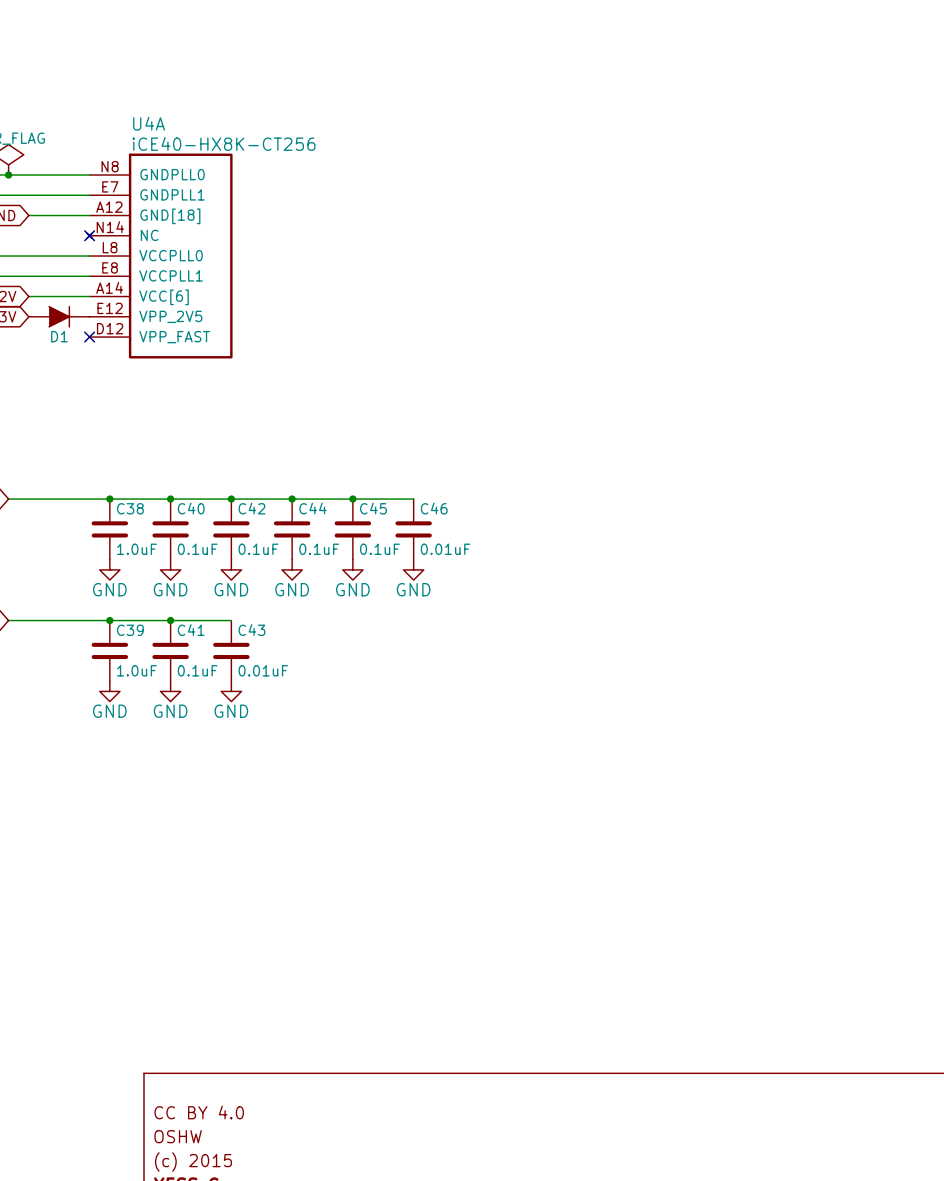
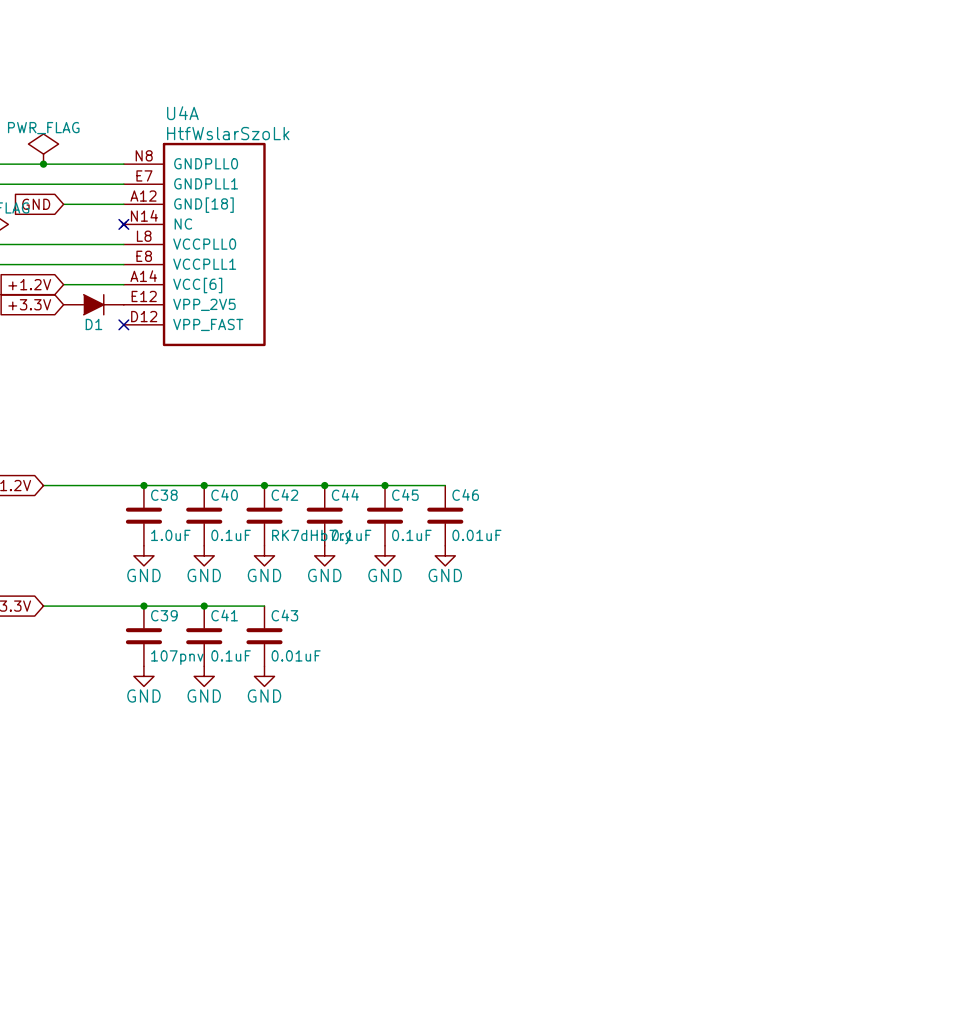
U4A value: iCE40-HX8K-CT256 (224, 143) -> HtfWslarSzoLk (228, 133)
C42 value: 0.1uF (258, 549) -> RK7dHb7ry (311, 537)
C39 value: 1.0uF (136, 670) -> 107pnv (177, 657)

